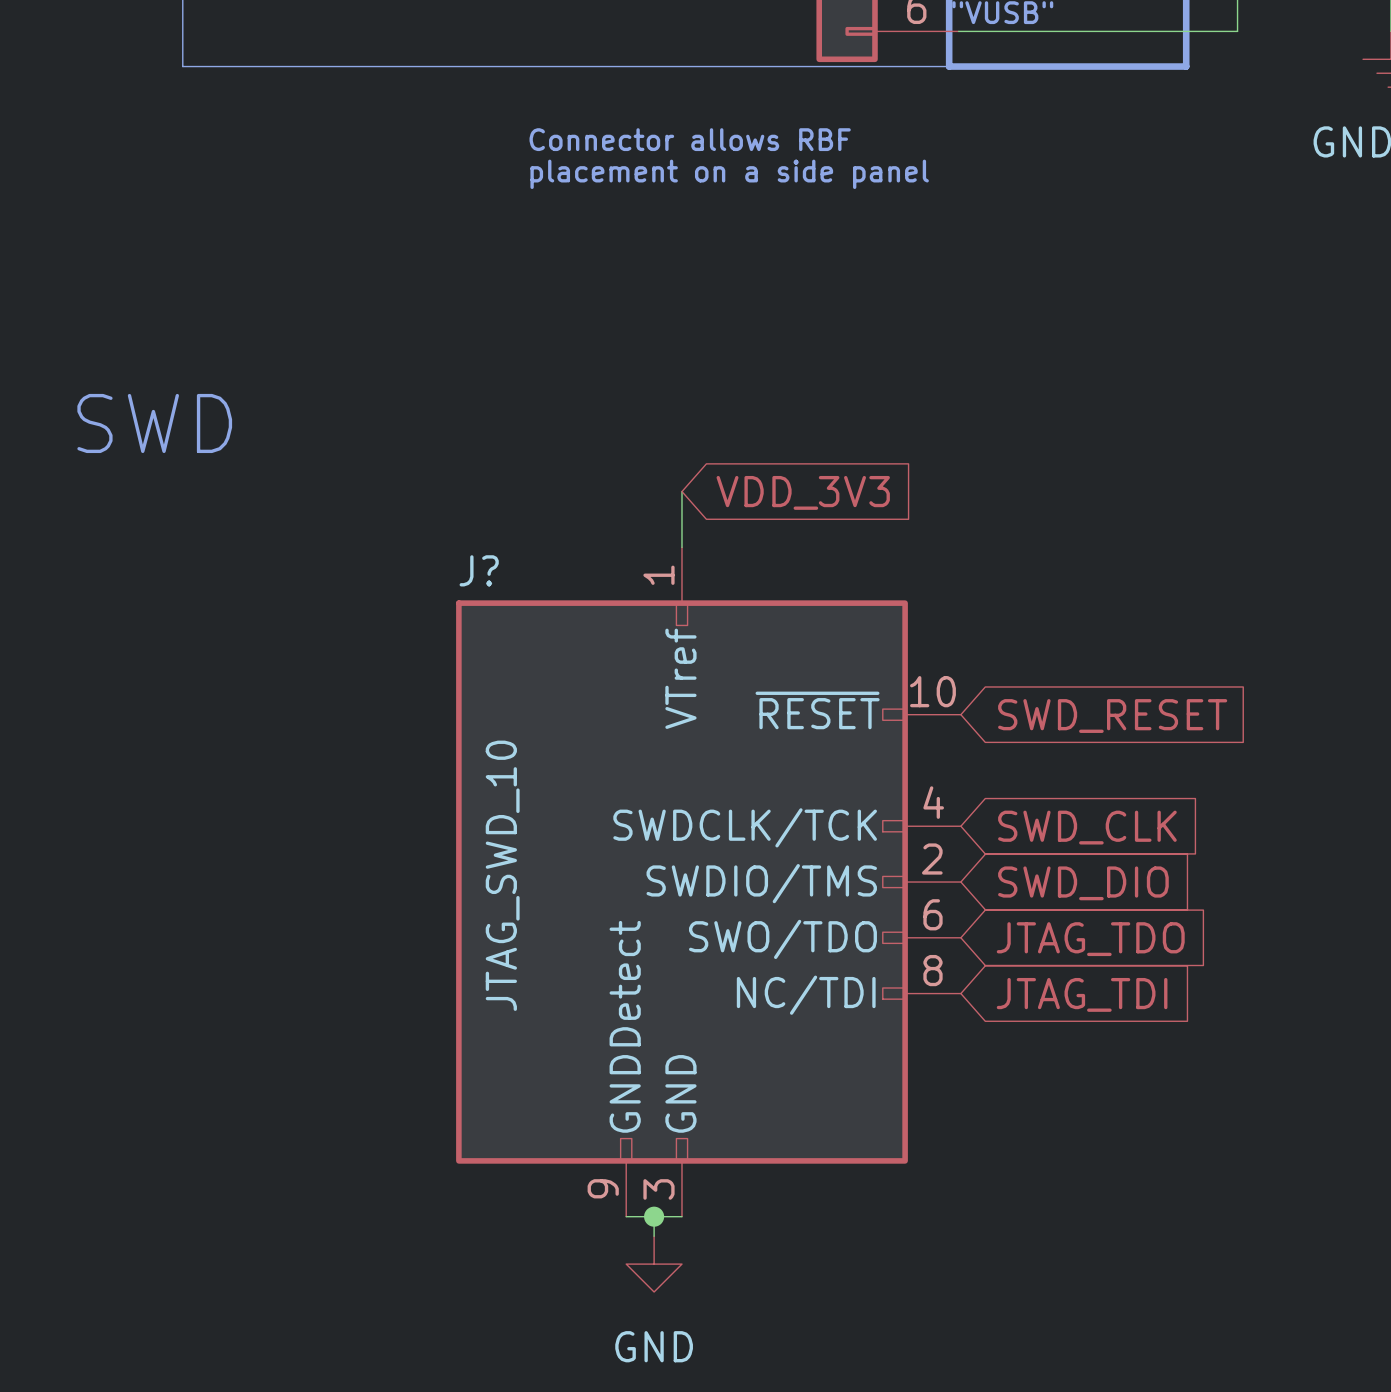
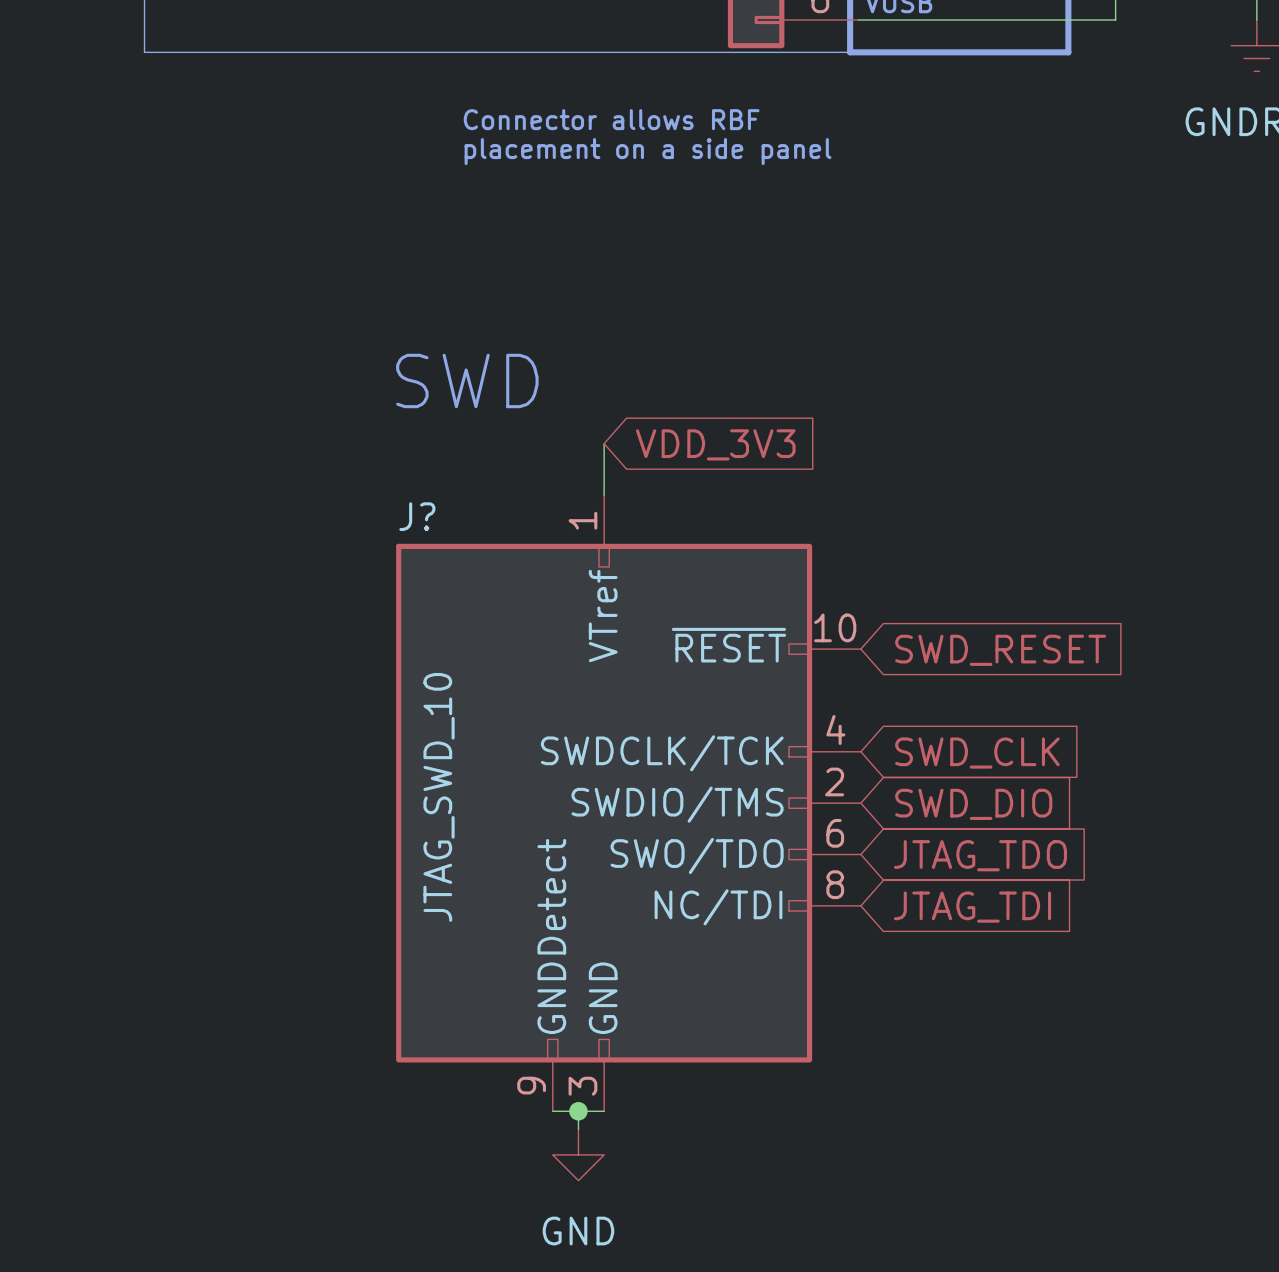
text position: SWD (154, 423) -> SWD (467, 380)

